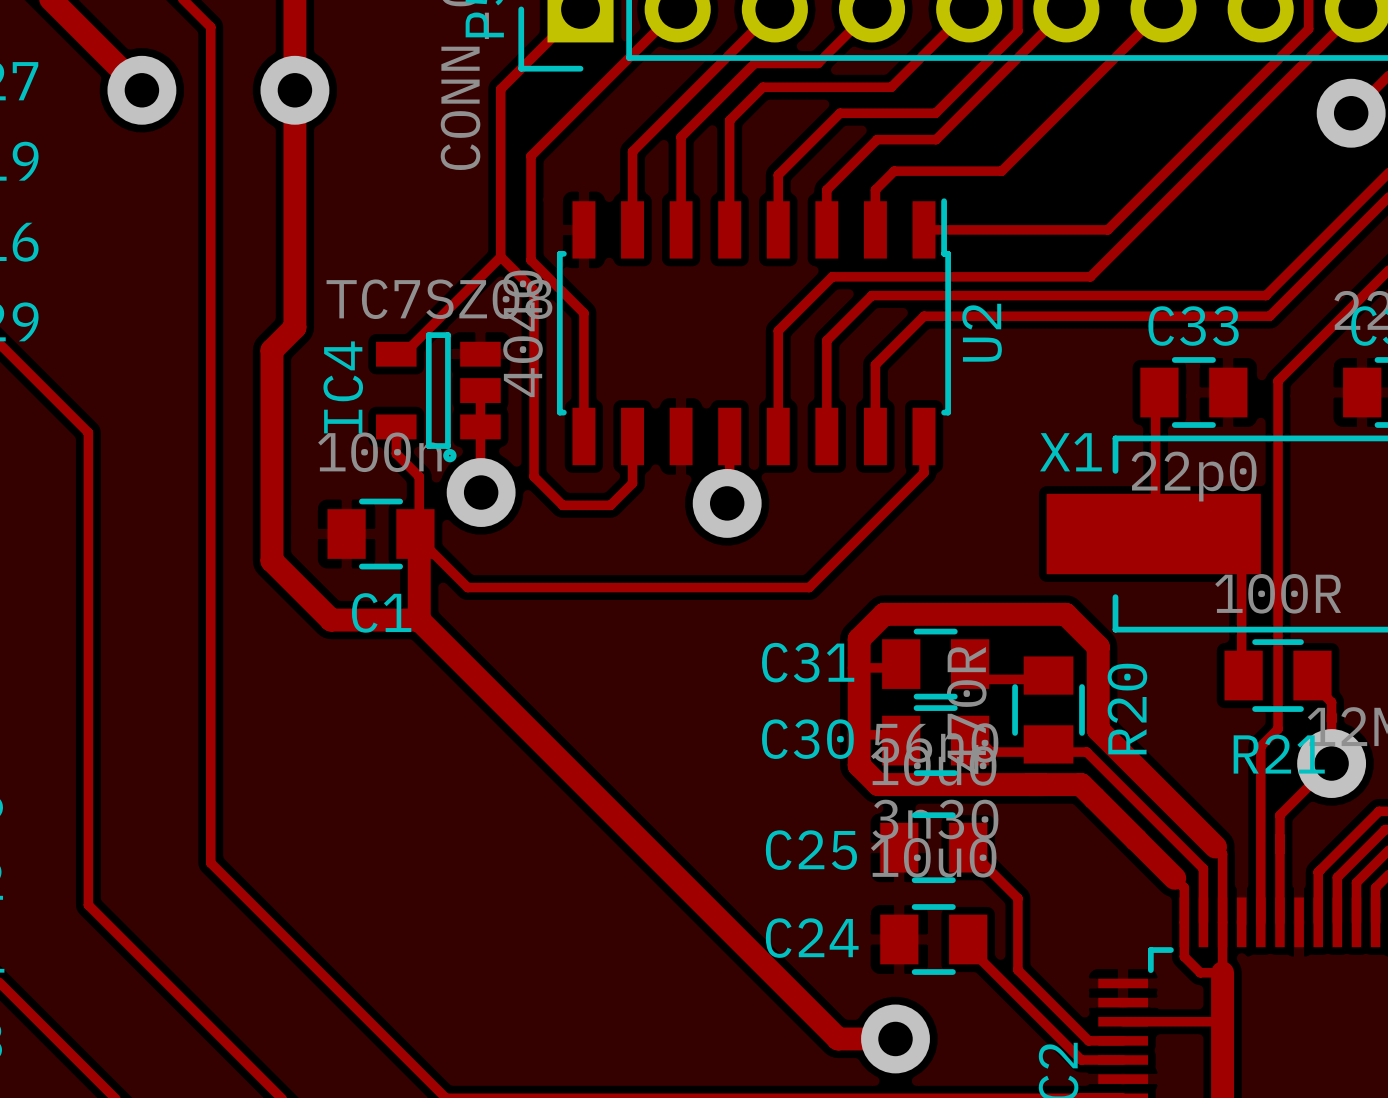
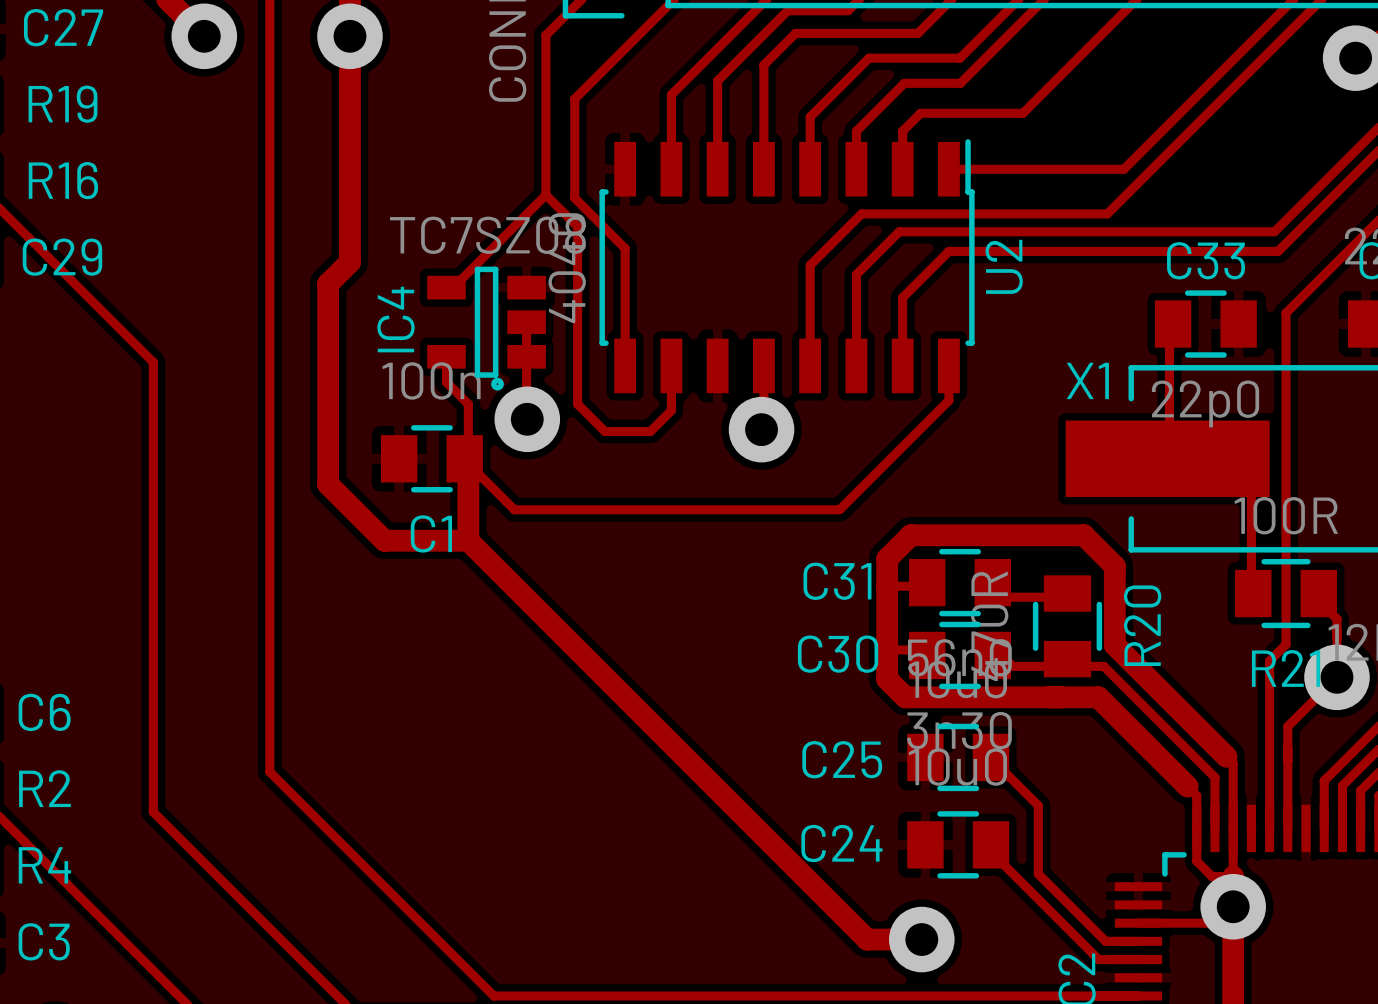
via: none -> (1233, 906)

